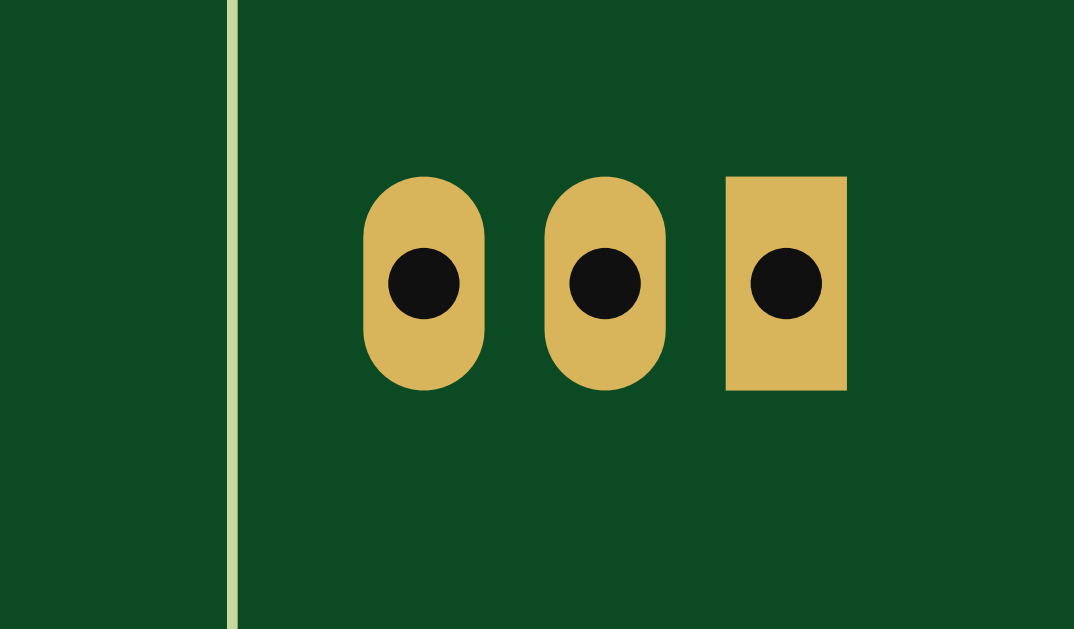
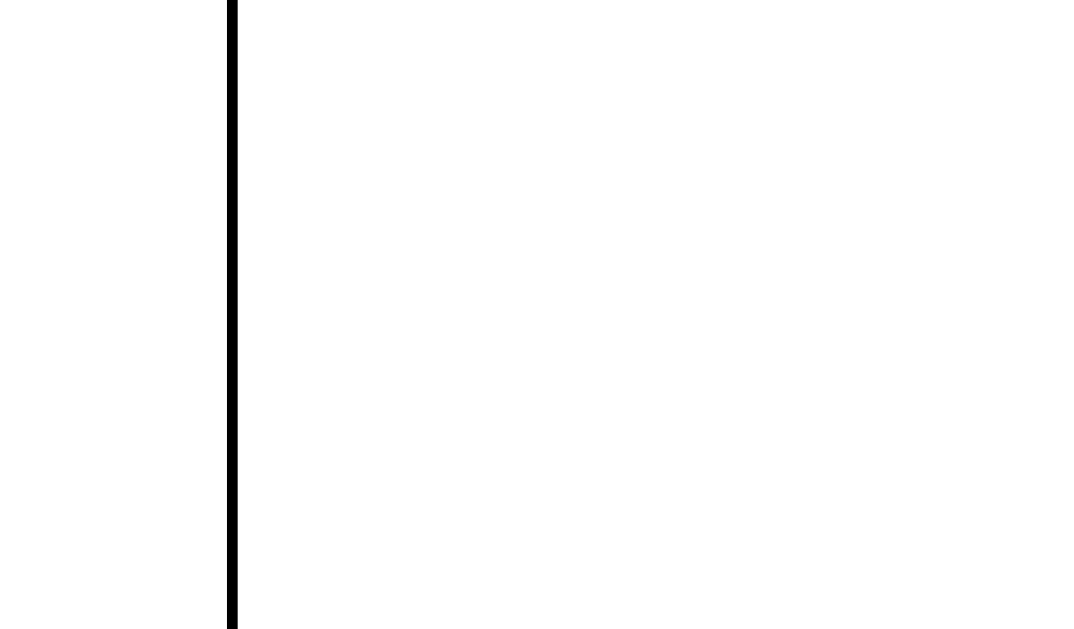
part: (605, 283) -> none

